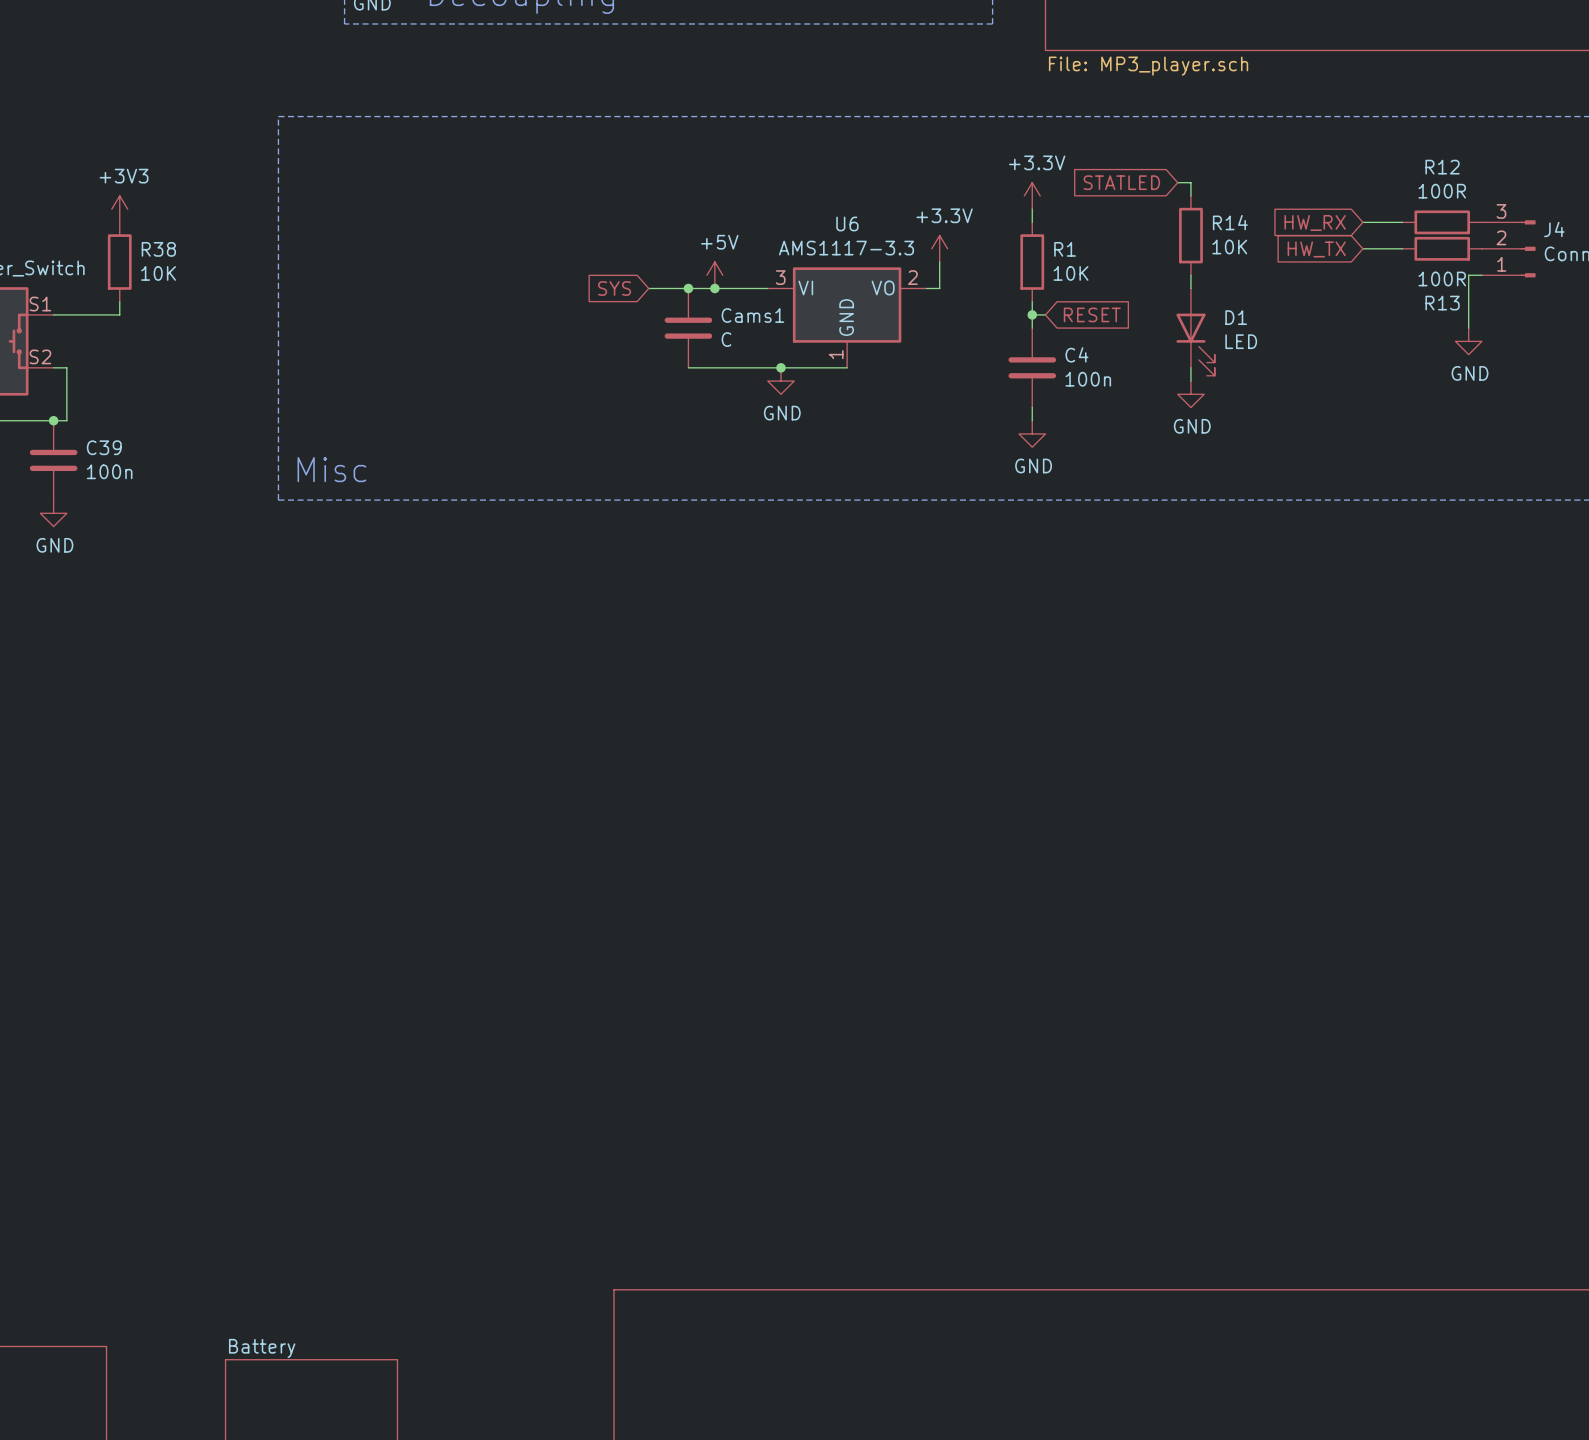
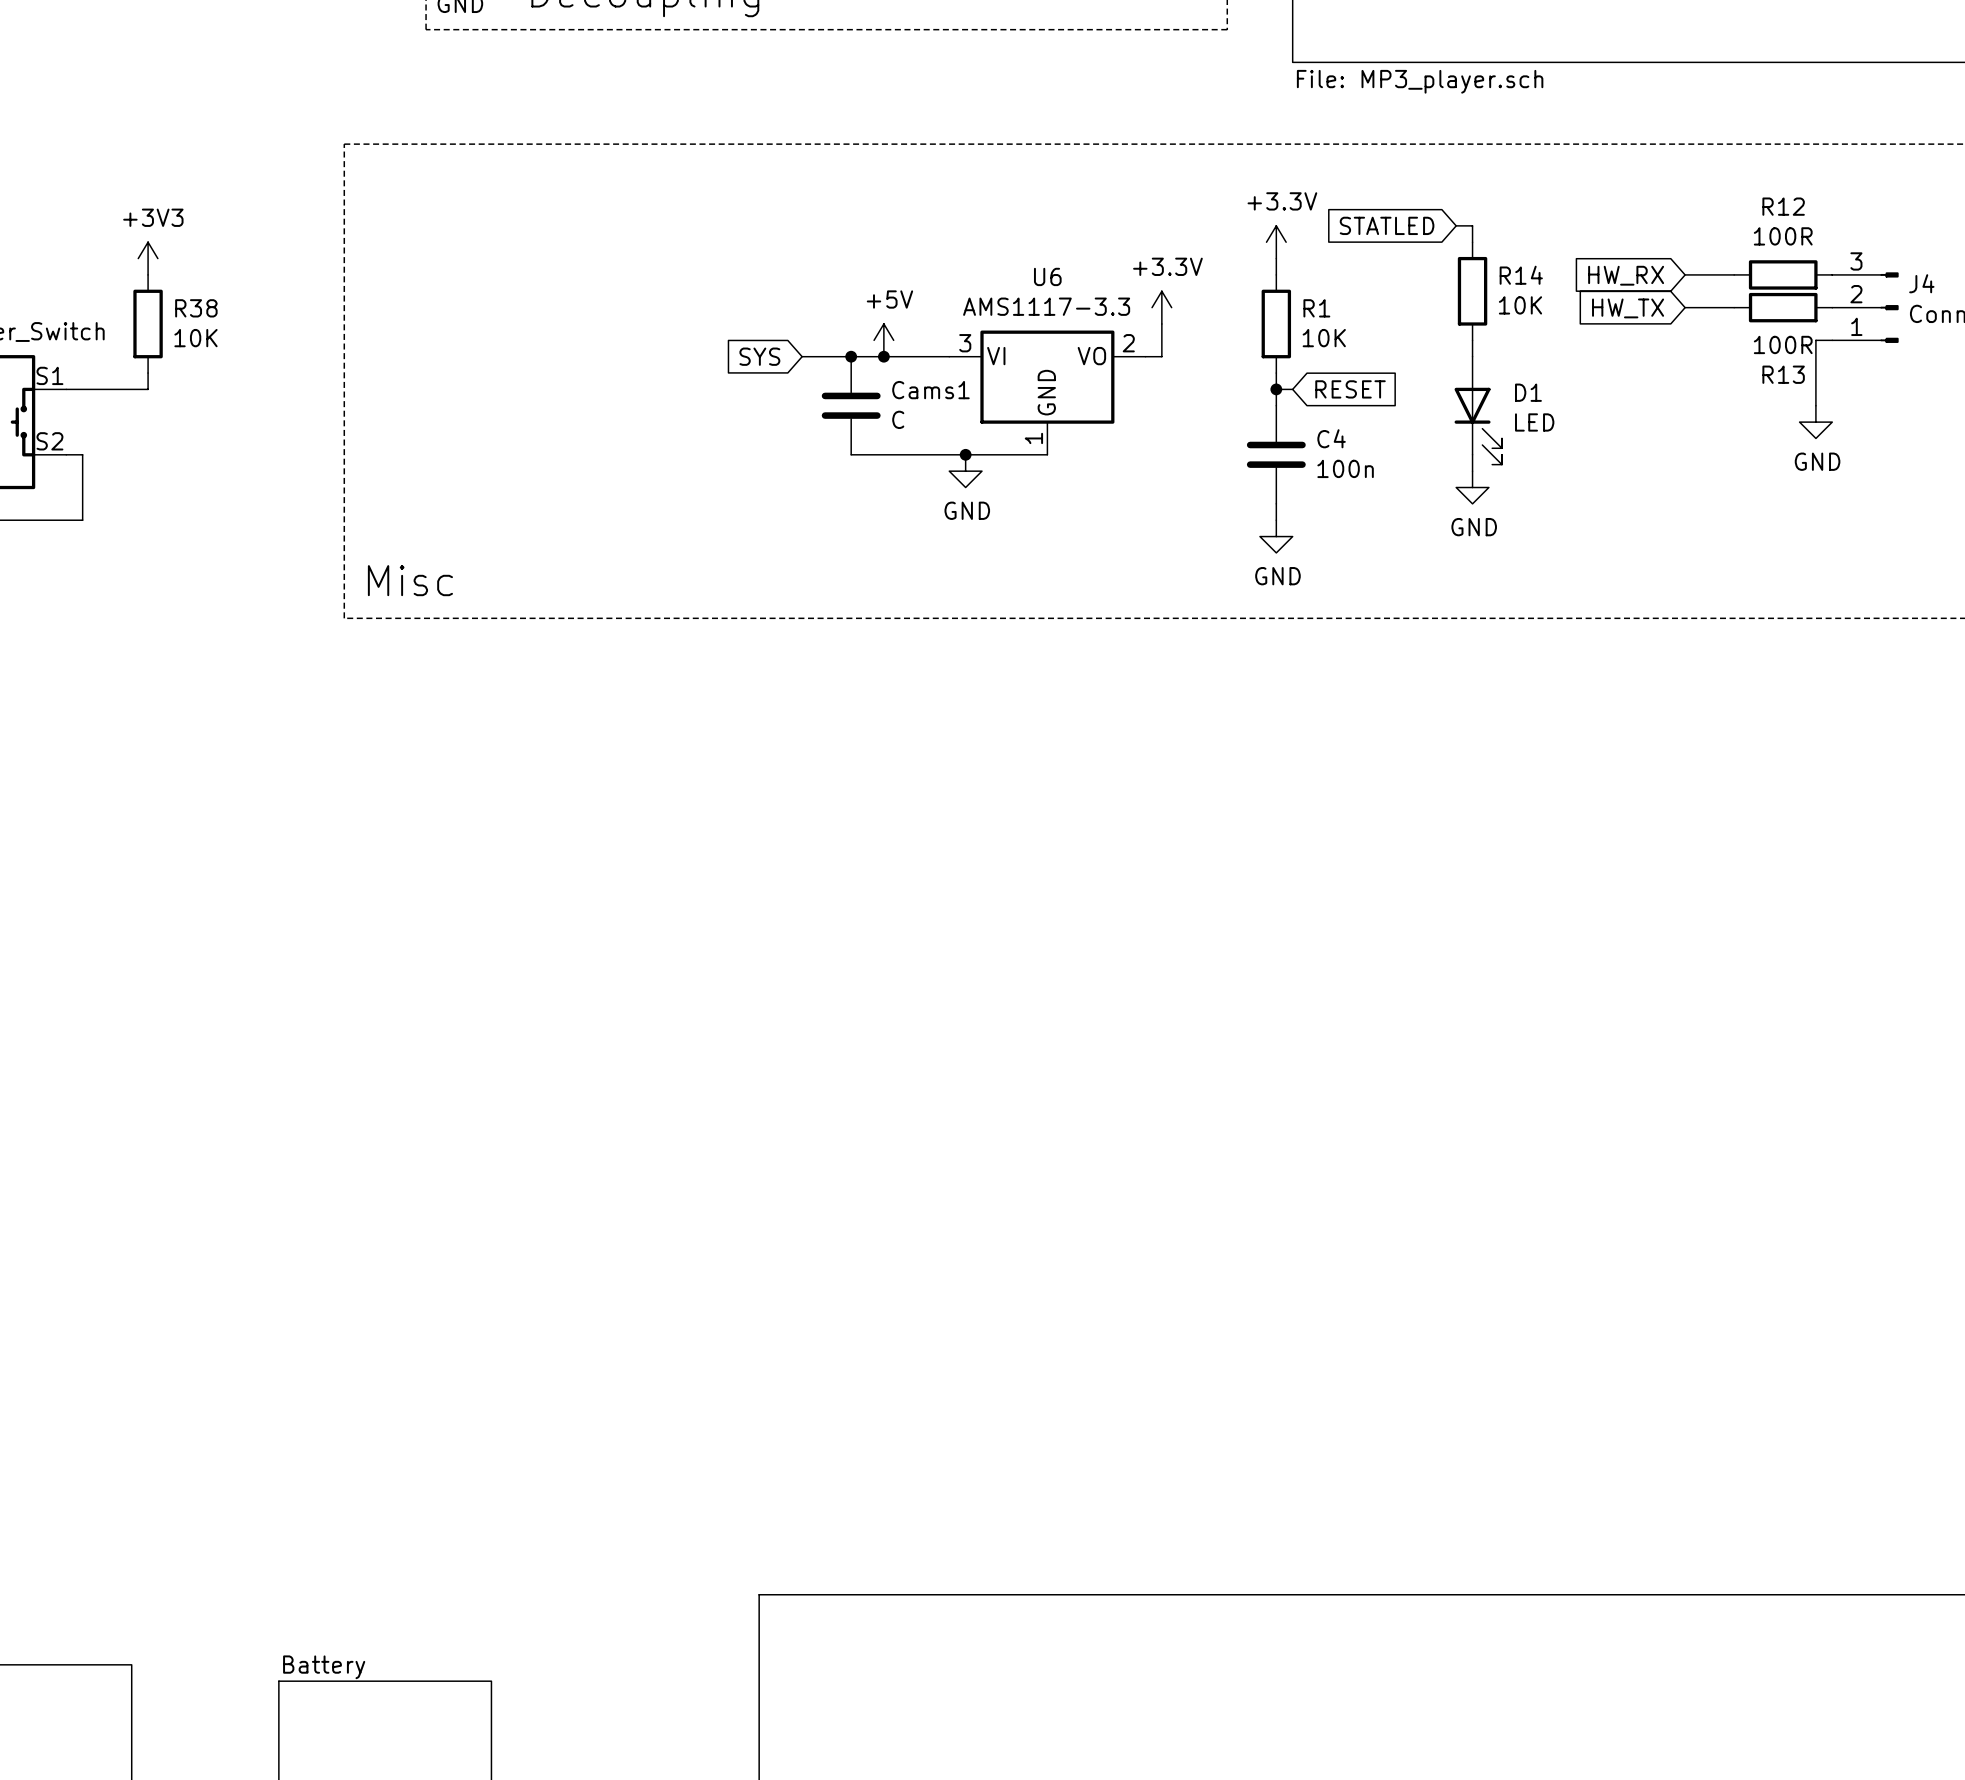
junction: (53, 420) -> none
C39: 100n (53, 460) -> none
power symbol: GND (53, 513) -> none

